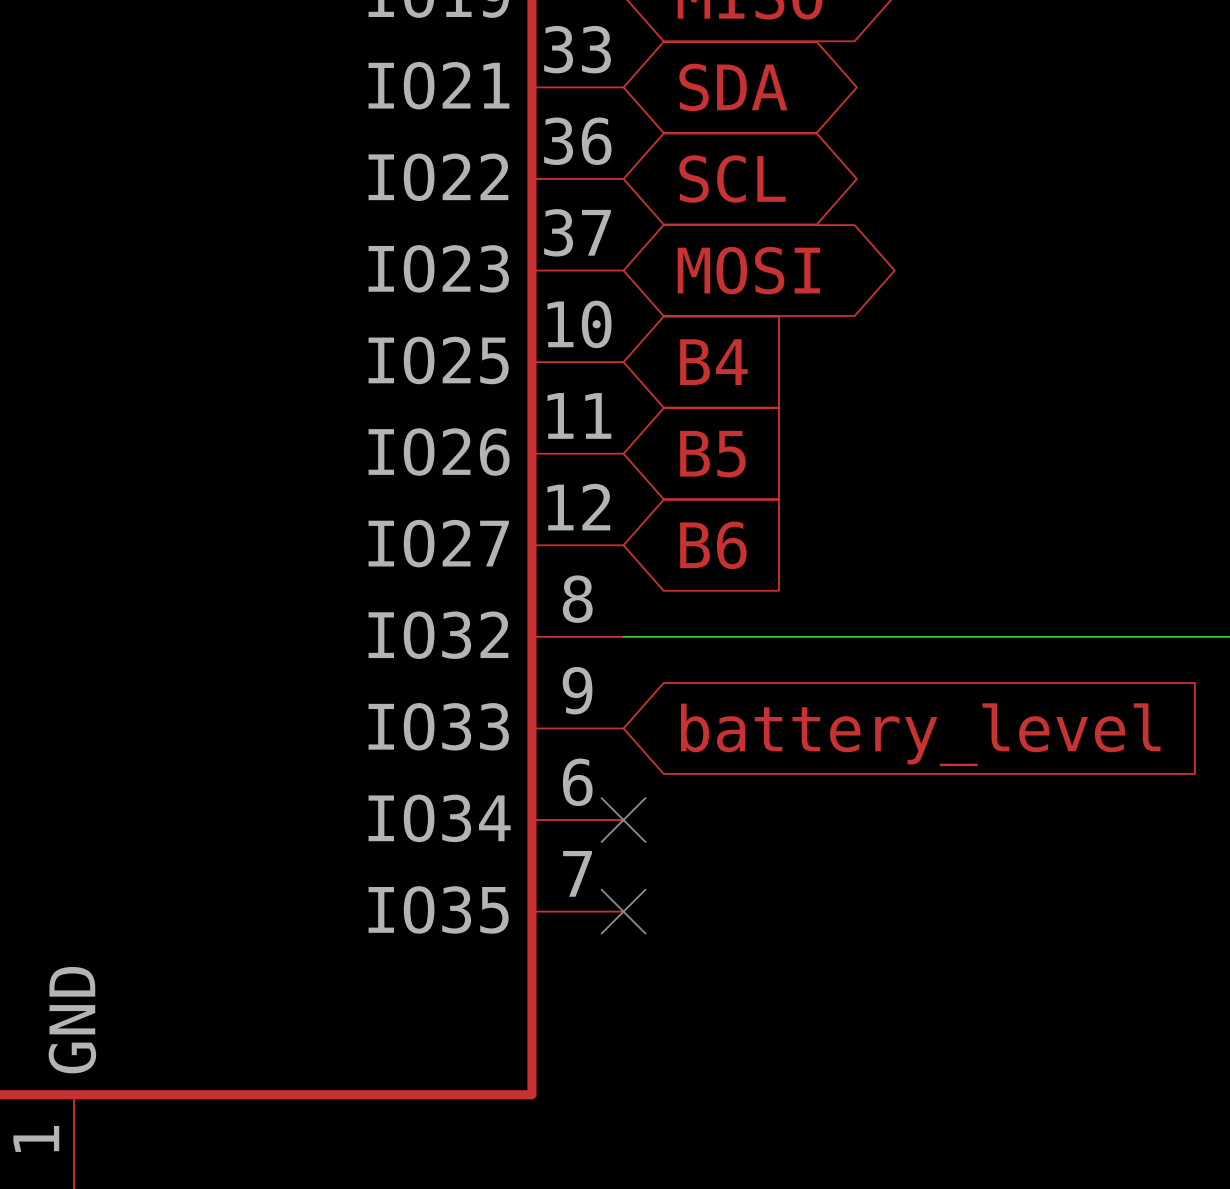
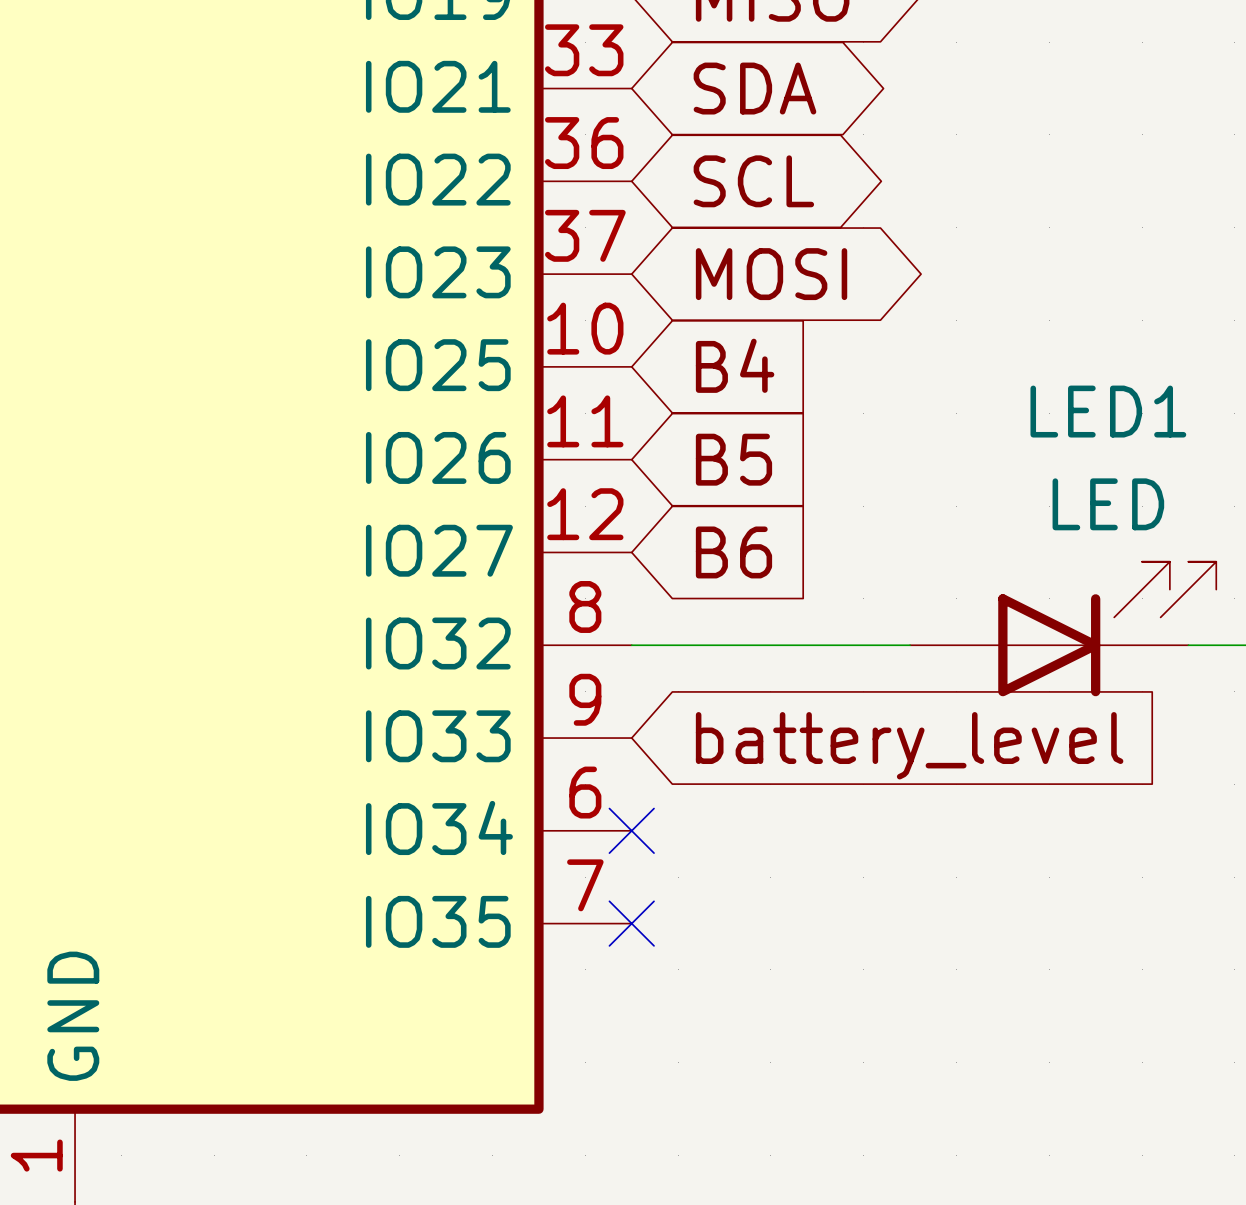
LED1: none -> LED (1063, 629)

